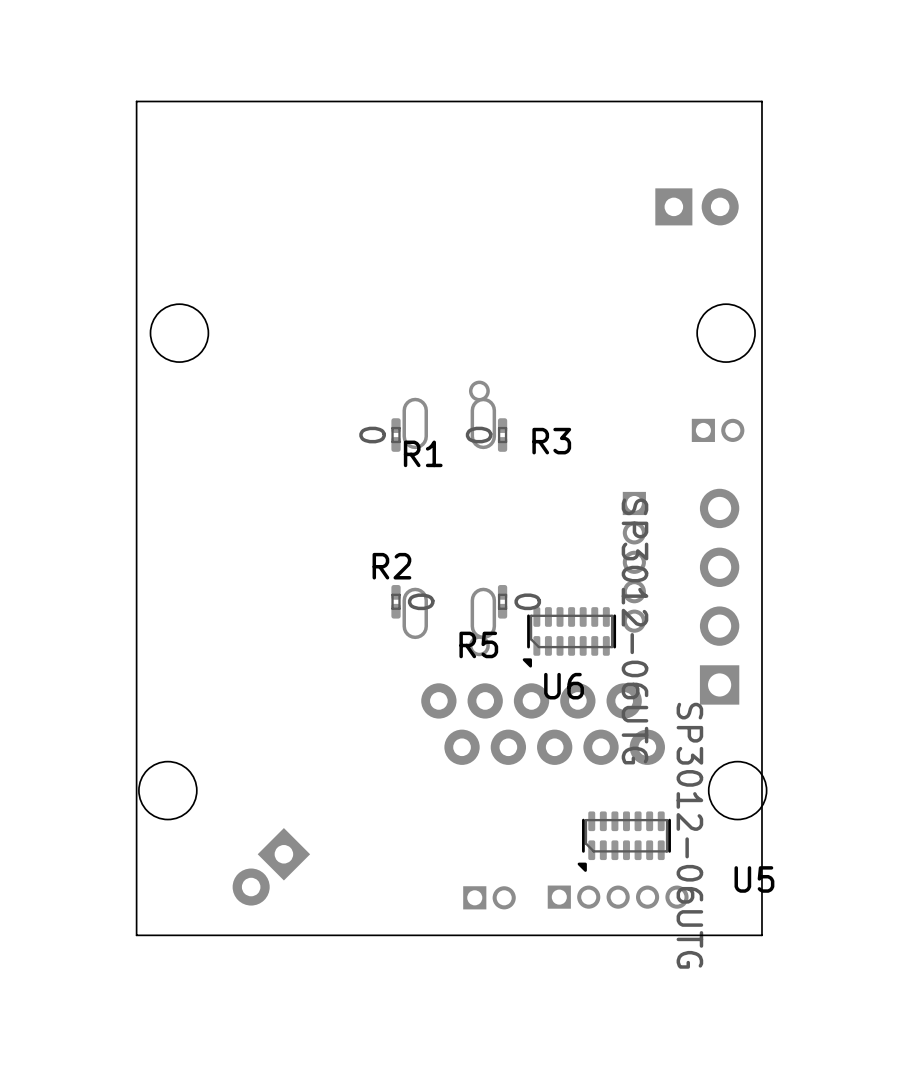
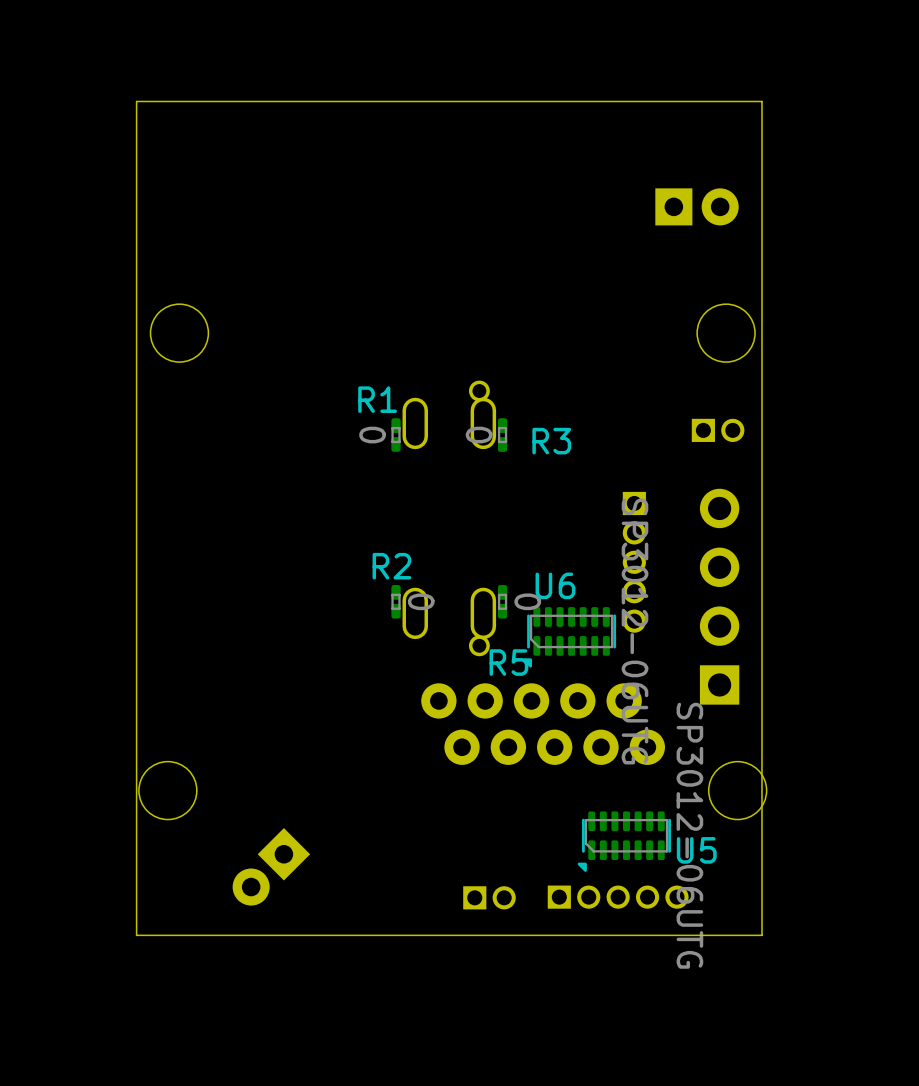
R1 name position: R1 (423, 453) -> R1 (377, 399)
R5 name position: R5 (478, 644) -> R5 (508, 662)
U6 name position: U6 (564, 686) -> U6 (555, 585)
U5 name position: U5 (754, 879) -> U5 (696, 850)

